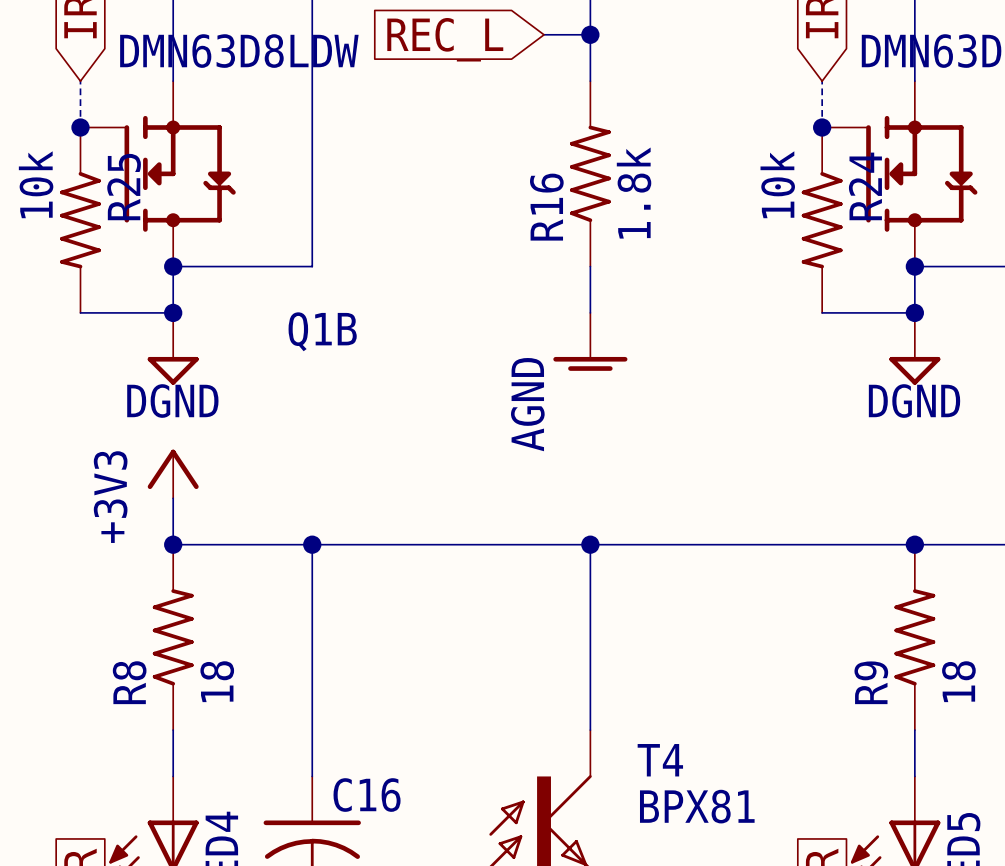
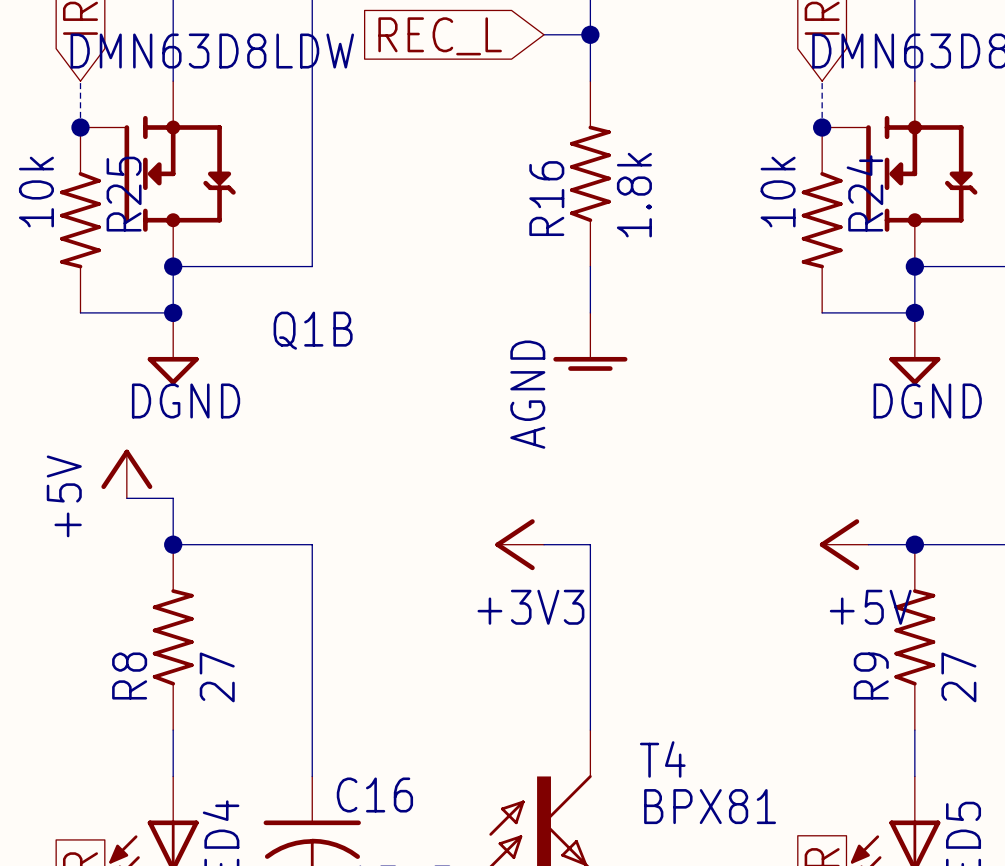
power symbol rotation: 0° (173, 469) -> 90° counterclockwise (515, 544)
power symbol: none -> +5V (126, 474)
power symbol position: +3V3 (173, 474) -> +3V3 (519, 544)
wire: none -> (126, 498) (173, 498)
wire: (312, 544) (544, 544) -> none
junction: (312, 544) -> none
wire: (590, 544) (868, 544) -> none
junction: (590, 544) -> none
power symbol: none -> +5V (844, 544)
R8 value: 18 (217, 681) -> 27 (217, 677)
R9 value: 18 (958, 681) -> 27 (958, 677)

